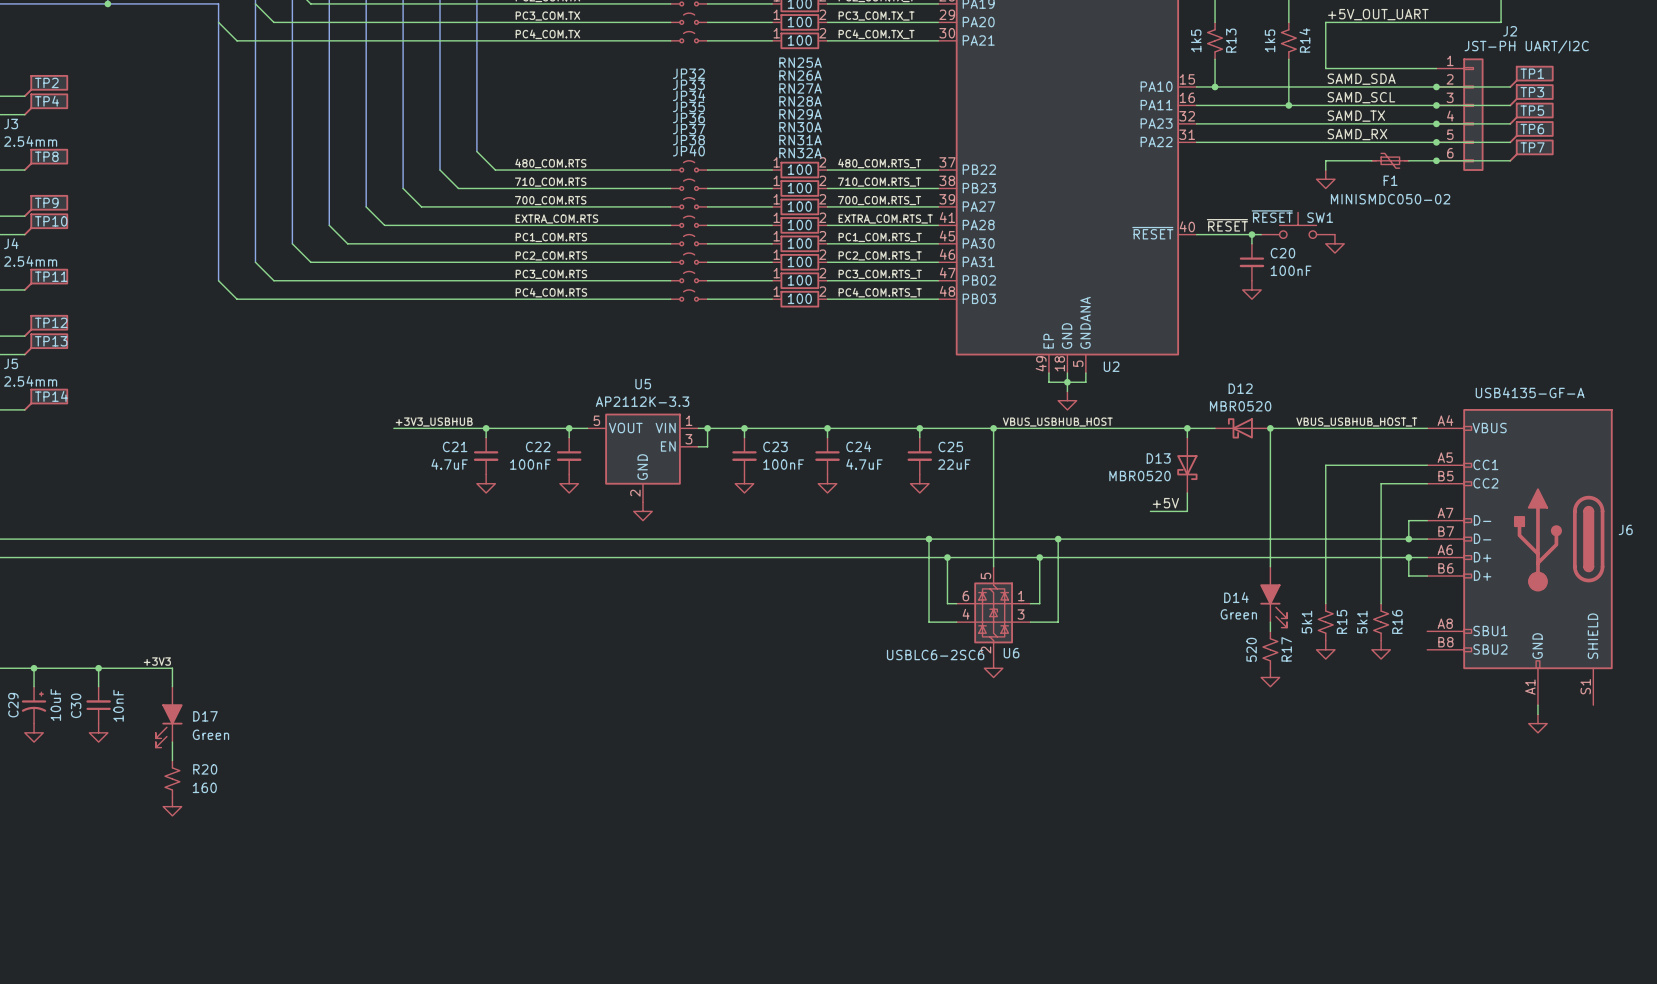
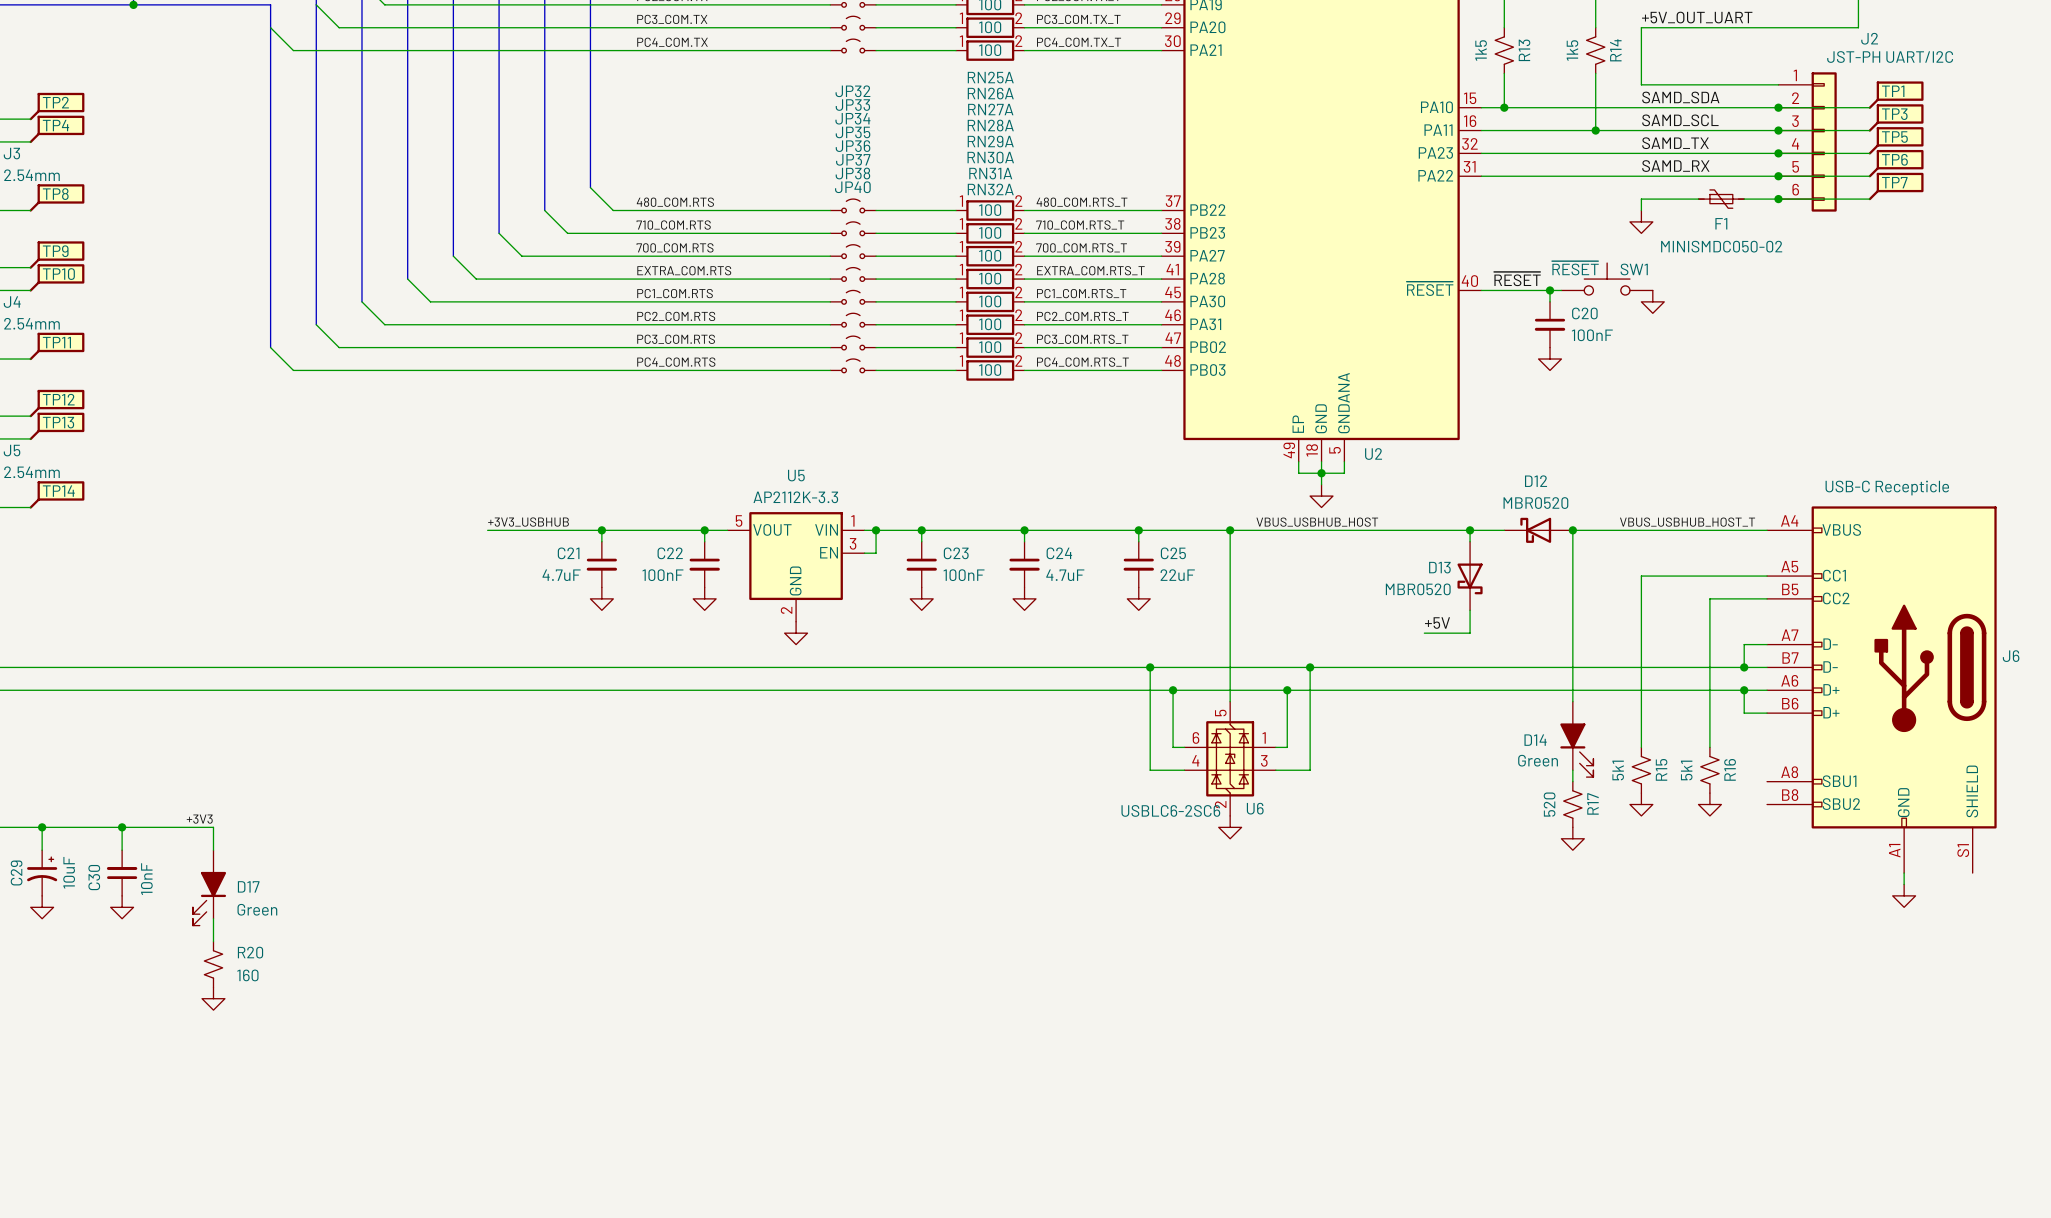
J6 value: USB4135-GF-A (1530, 392) -> USB-C Recepticle (1887, 488)

